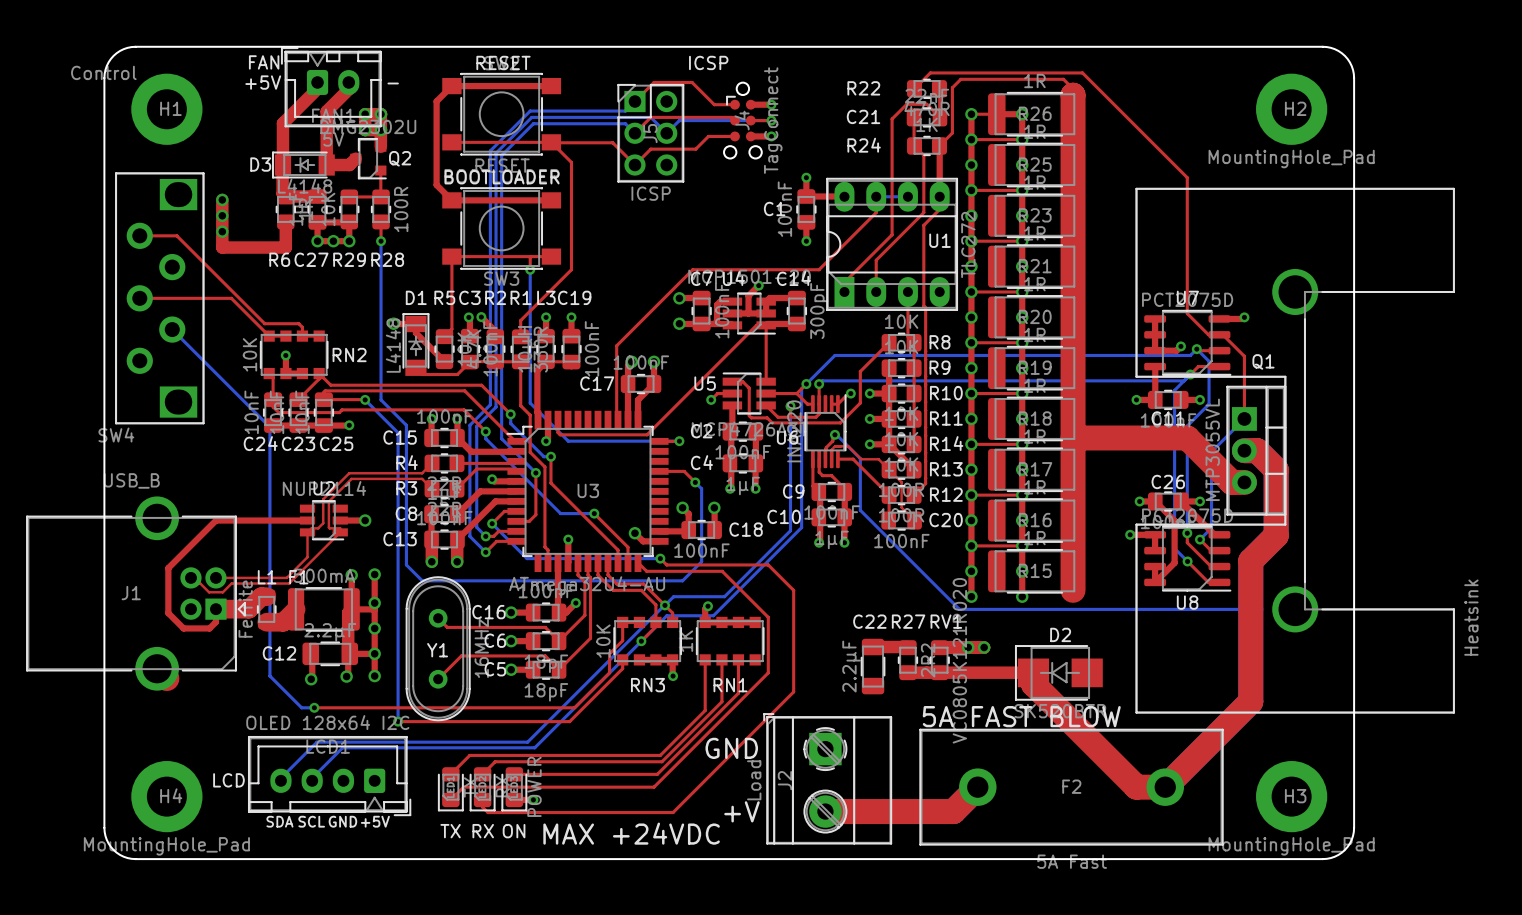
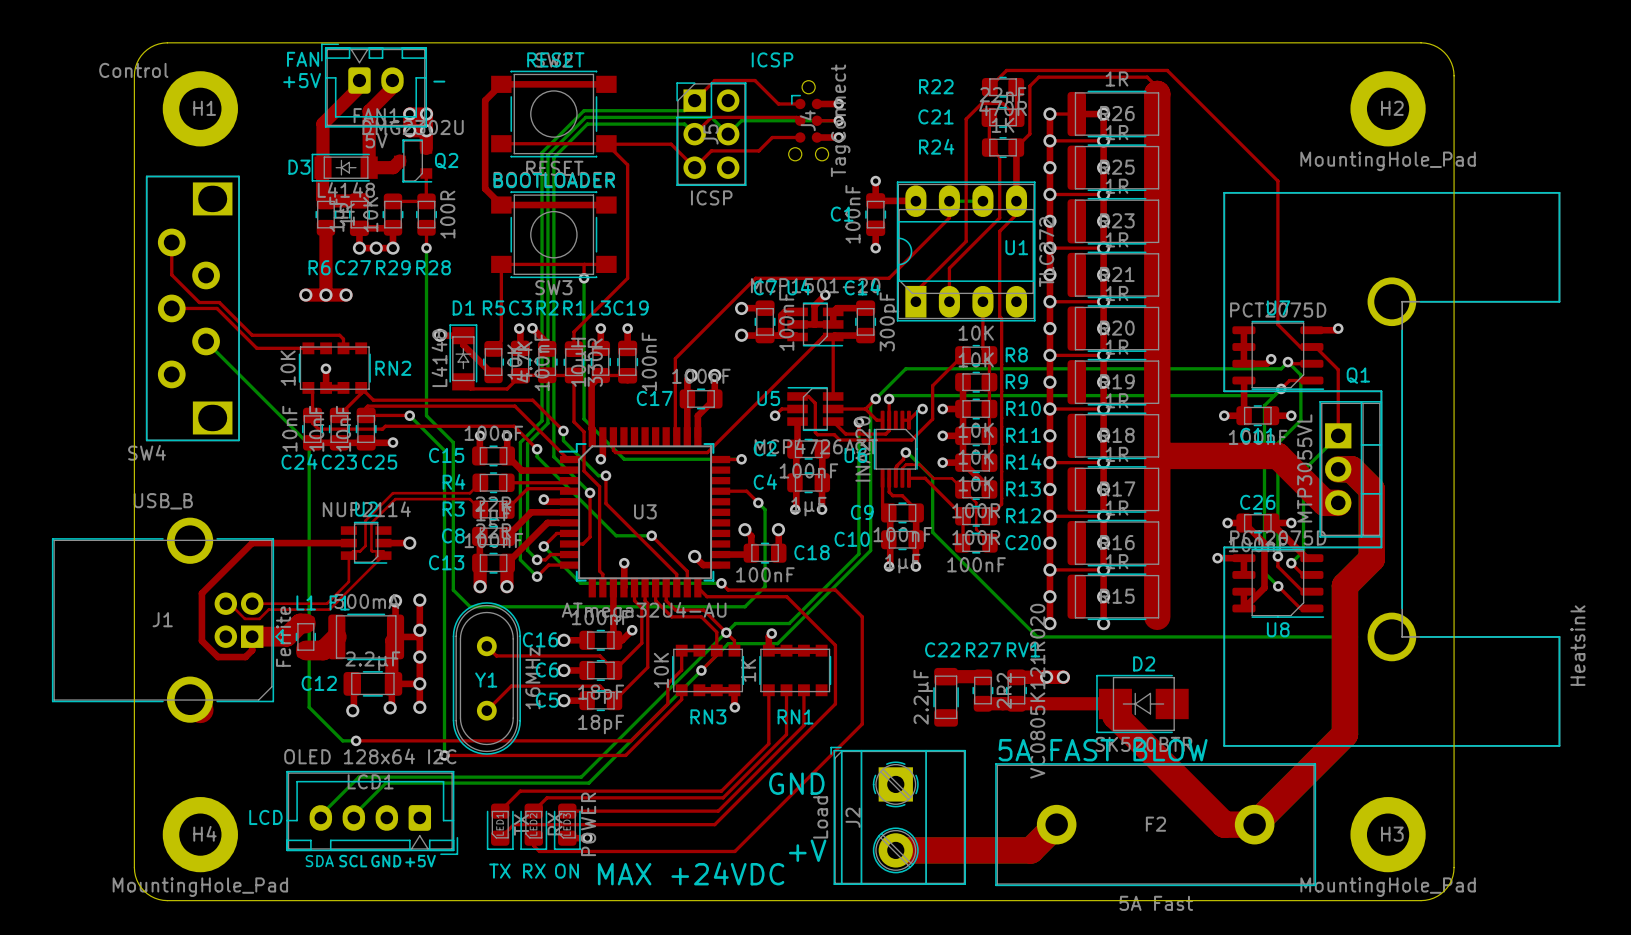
top track: (222, 199) (222, 247) (285, 247) -> (325, 295) (325, 254)
via: (222, 199) -> none
via: (222, 215) -> none
via: (222, 231) -> none
top track: (139, 235) (176, 235) (264, 323) -> (171, 242) (171, 274) (199, 302) (219, 302) (252, 335) (303, 335)
top track: none -> (305, 295) (346, 295)
via: none -> (305, 295)
via: none -> (325, 295)
via: none -> (346, 295)
top track: (182, 298) (231, 298) (269, 336) -> (216, 308) (256, 348) (308, 348)

